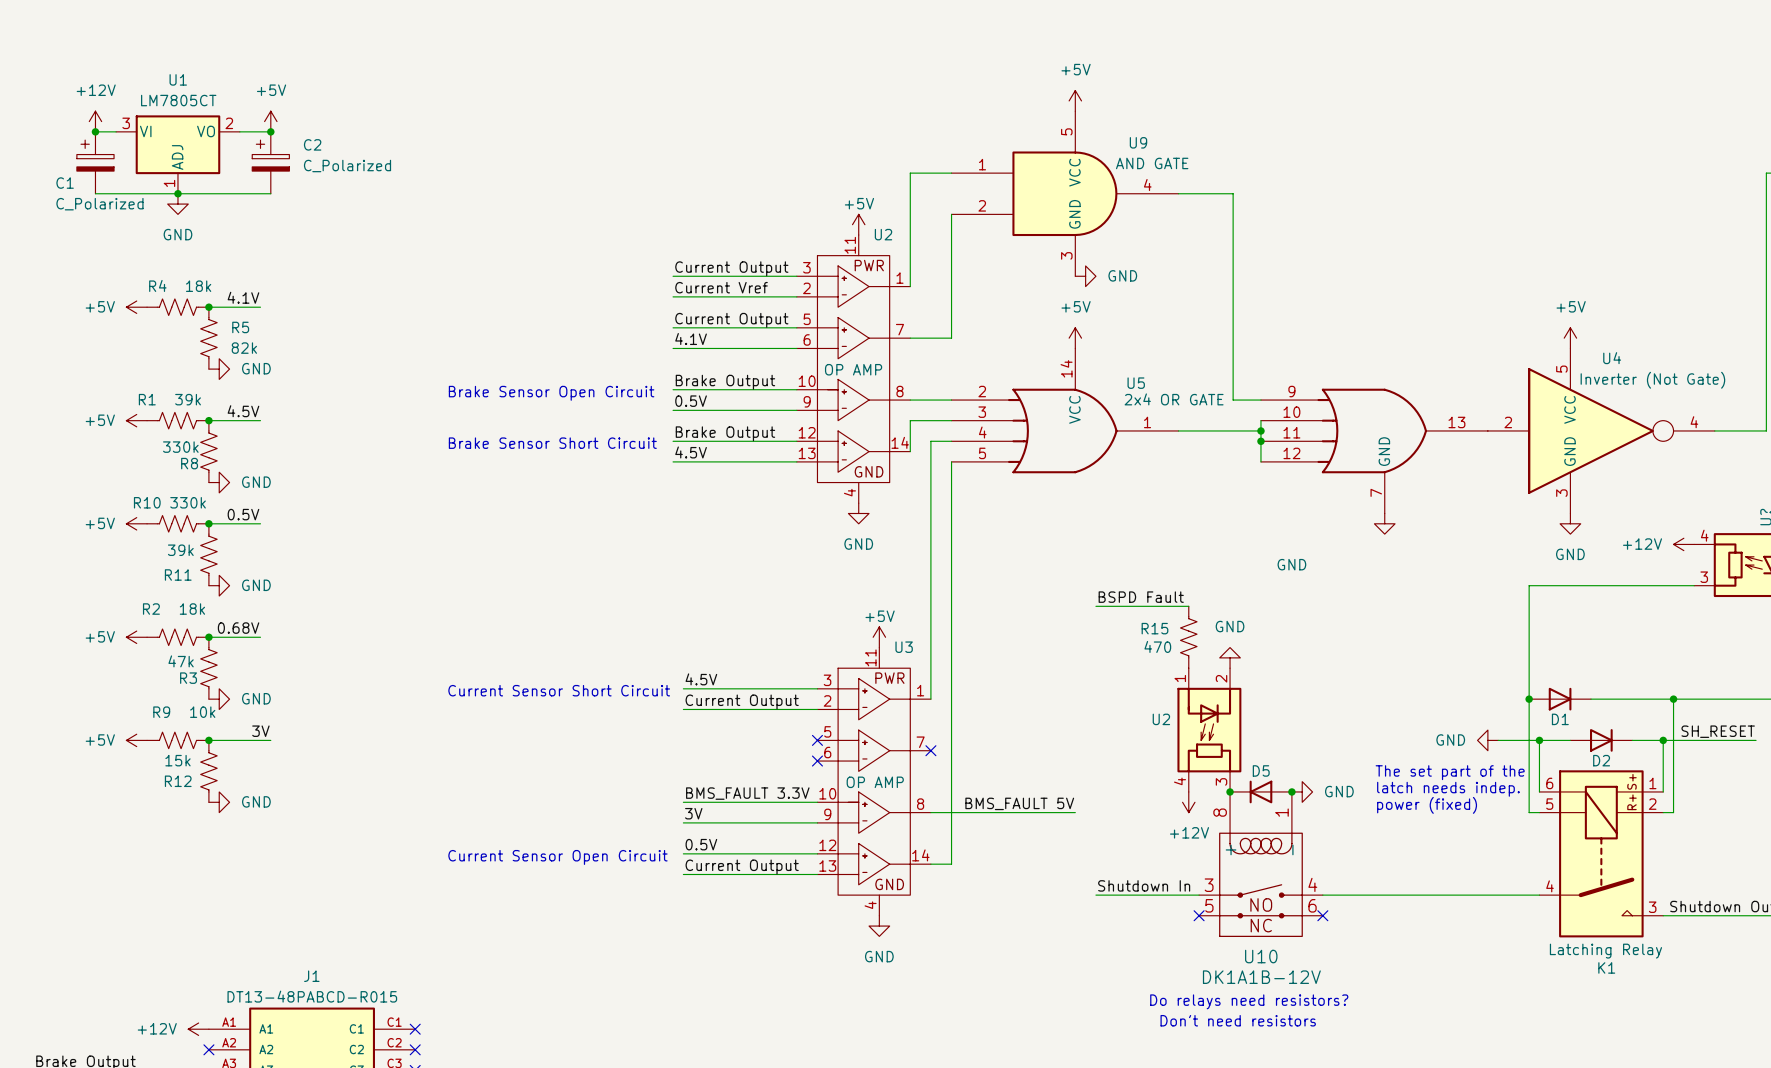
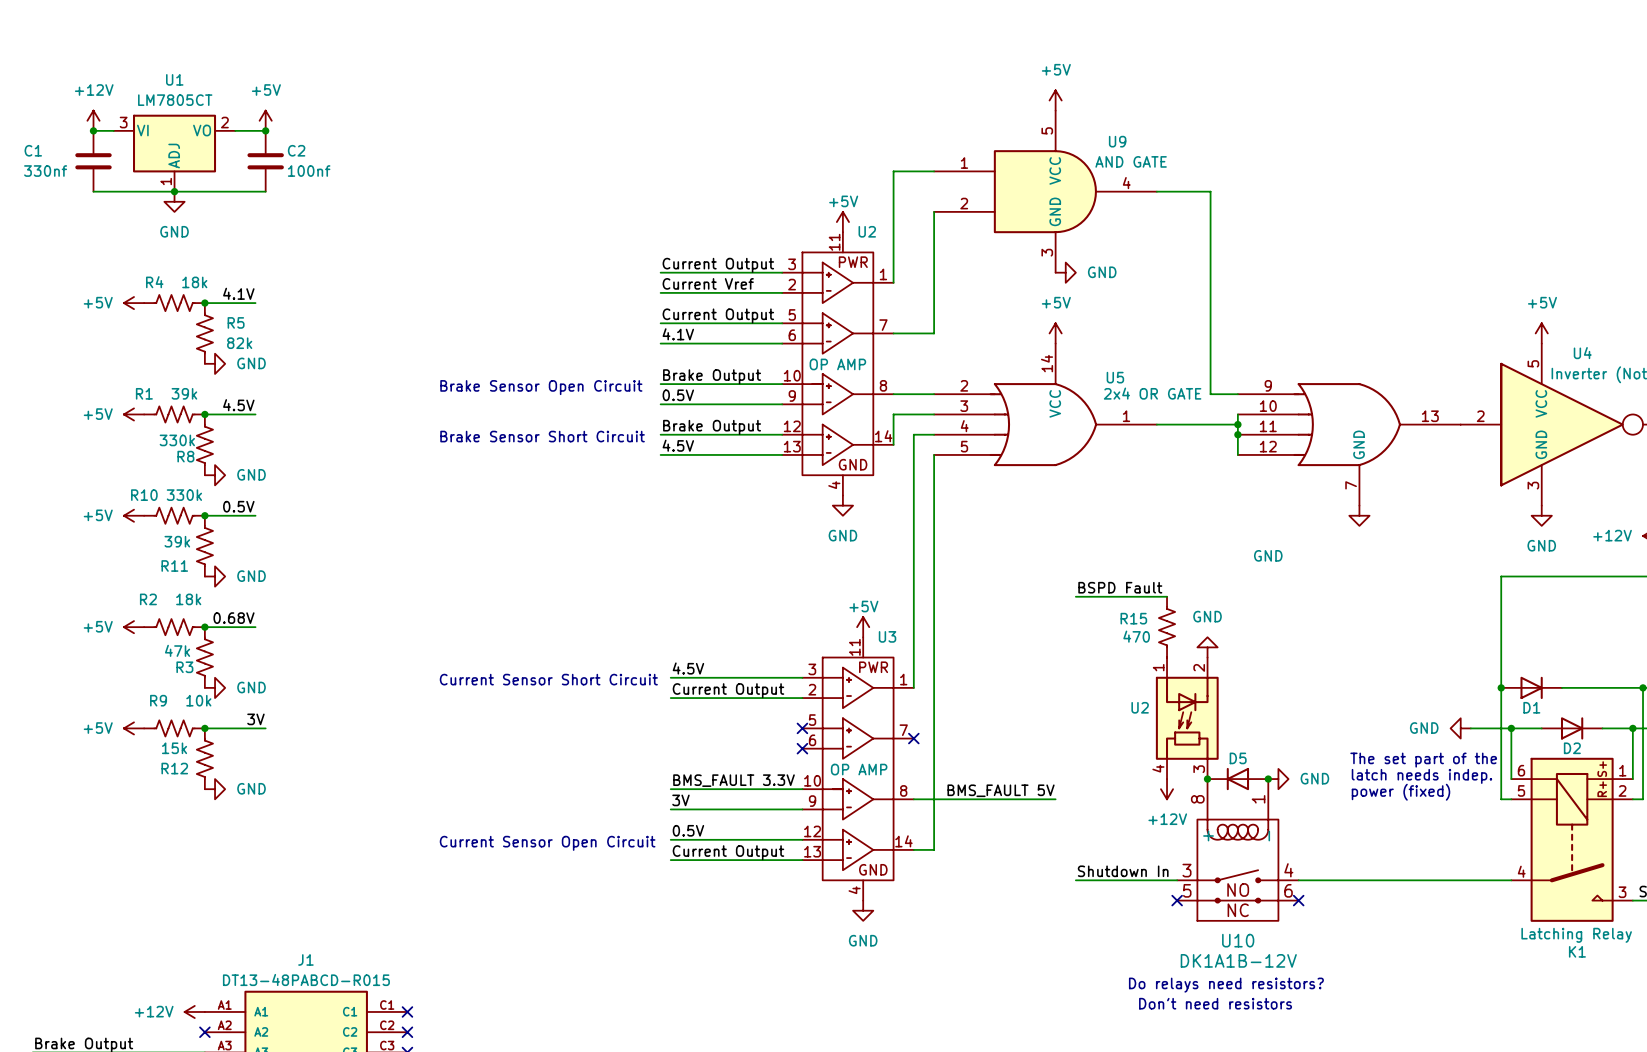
C1 symbol: [76, 131, 115, 194] -> [75, 130, 112, 192]
C2 symbol: [252, 131, 290, 194] -> [247, 130, 284, 192]
C2 value: C_Polarized (347, 166) -> 100nf (309, 171)
C1 name position: C1 (65, 183) -> C1 (33, 150)
C1 value: C_Polarized (99, 204) -> 330nf (45, 171)

